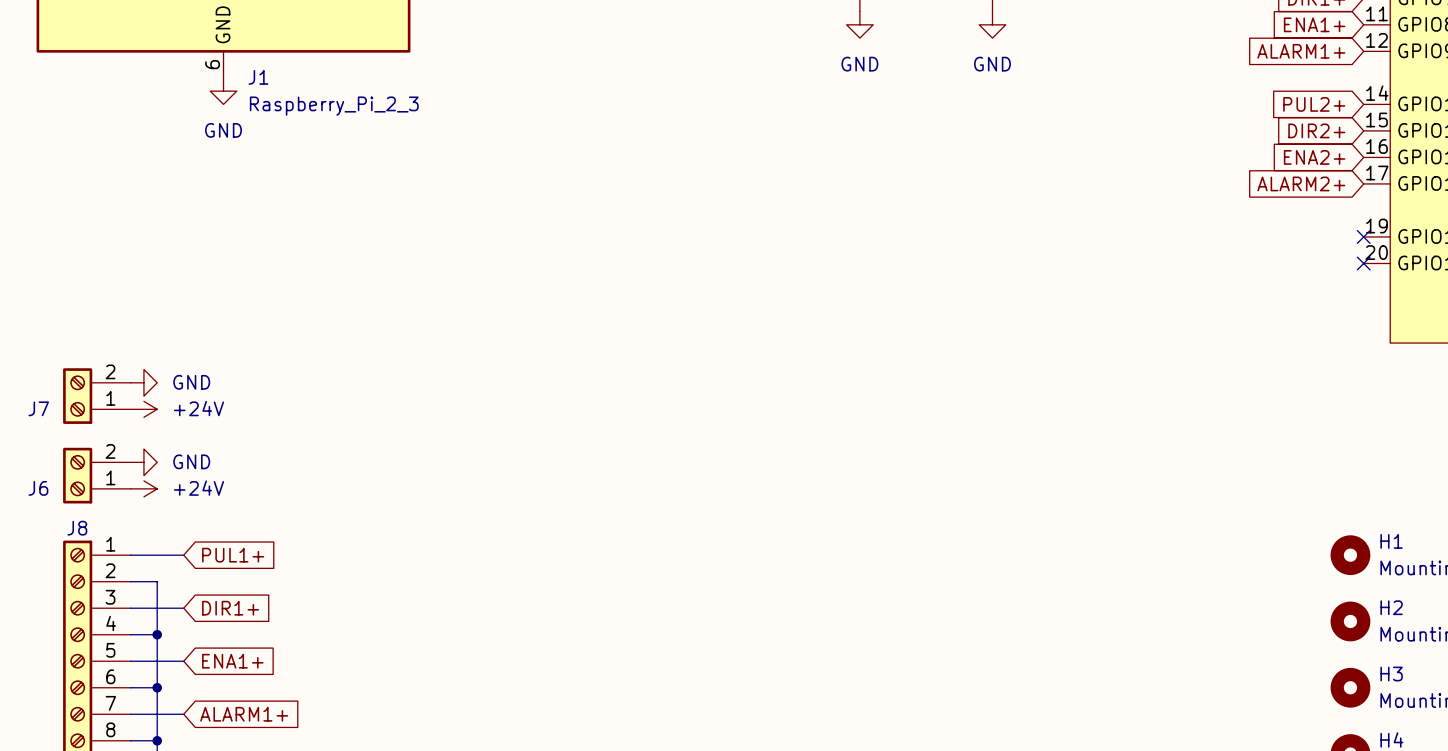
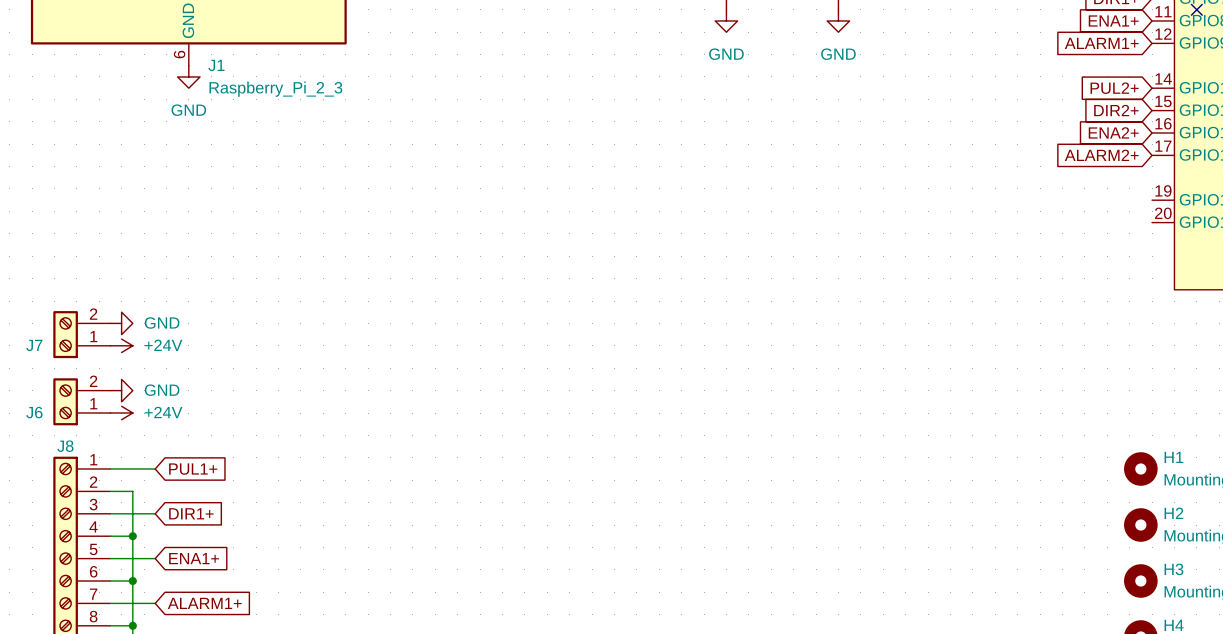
no-connect mark: none -> (1196, 9)
no-connect mark: (1363, 236) -> none
no-connect mark: (1363, 263) -> none

